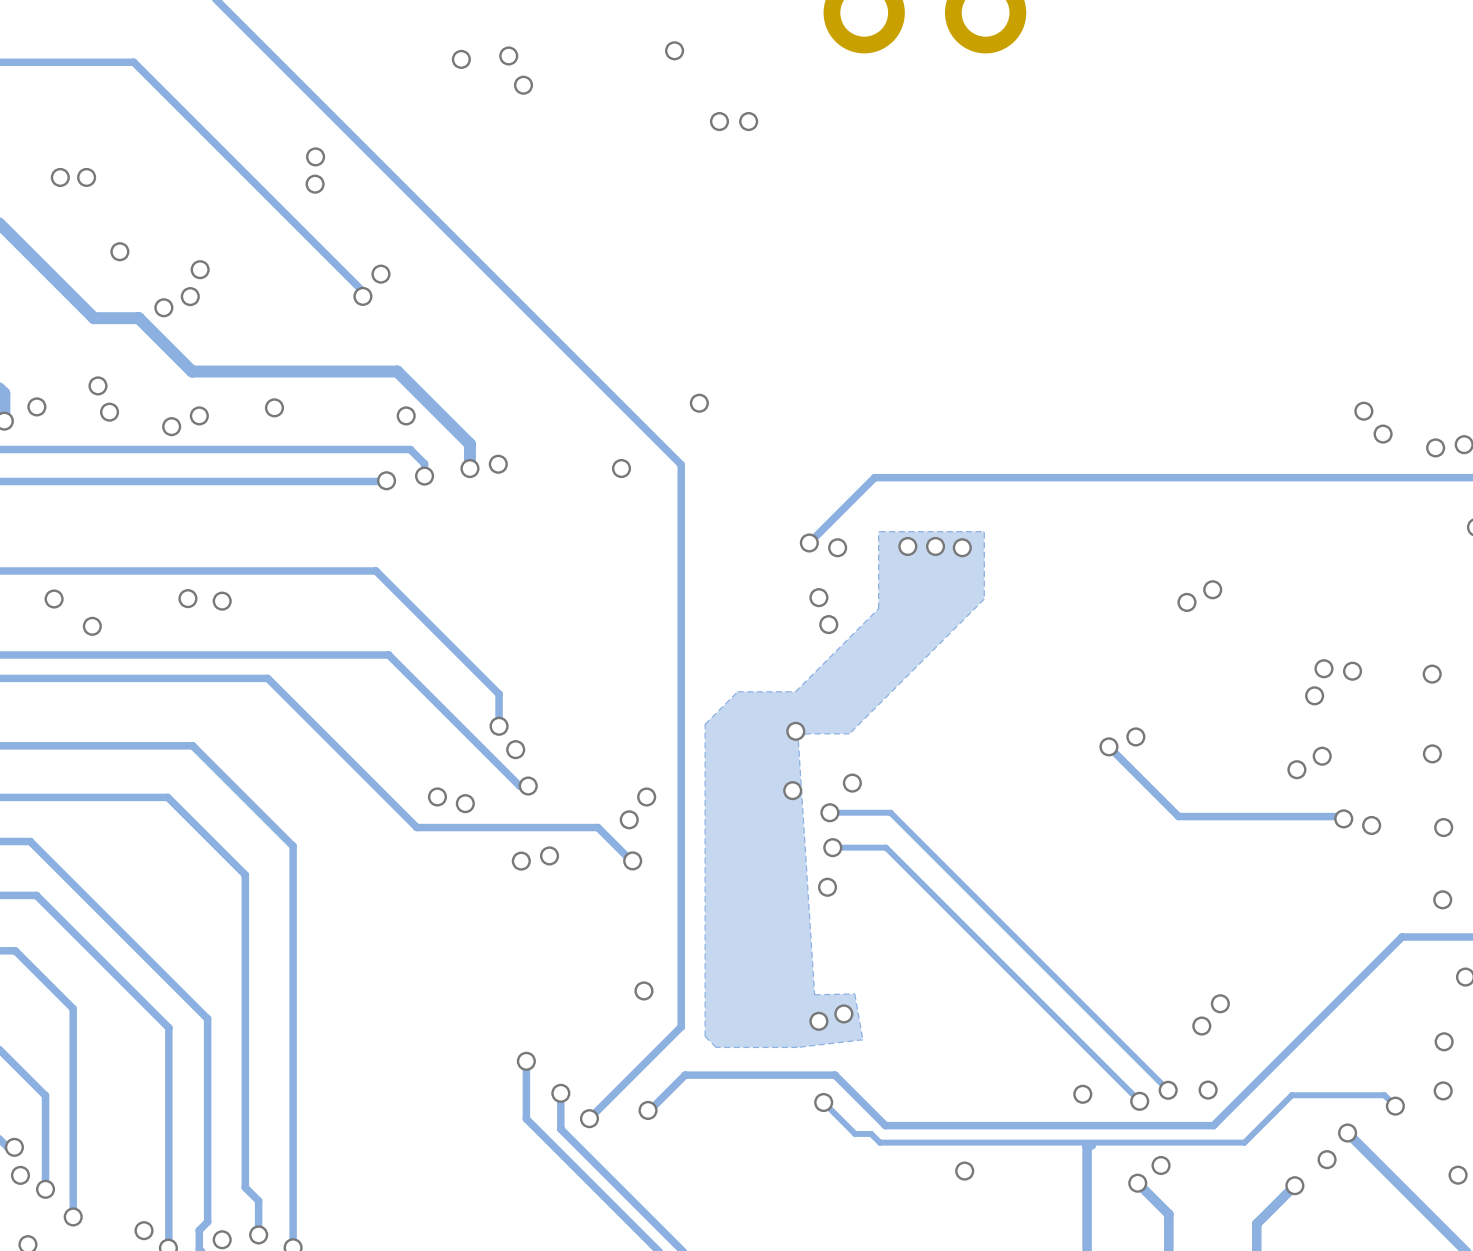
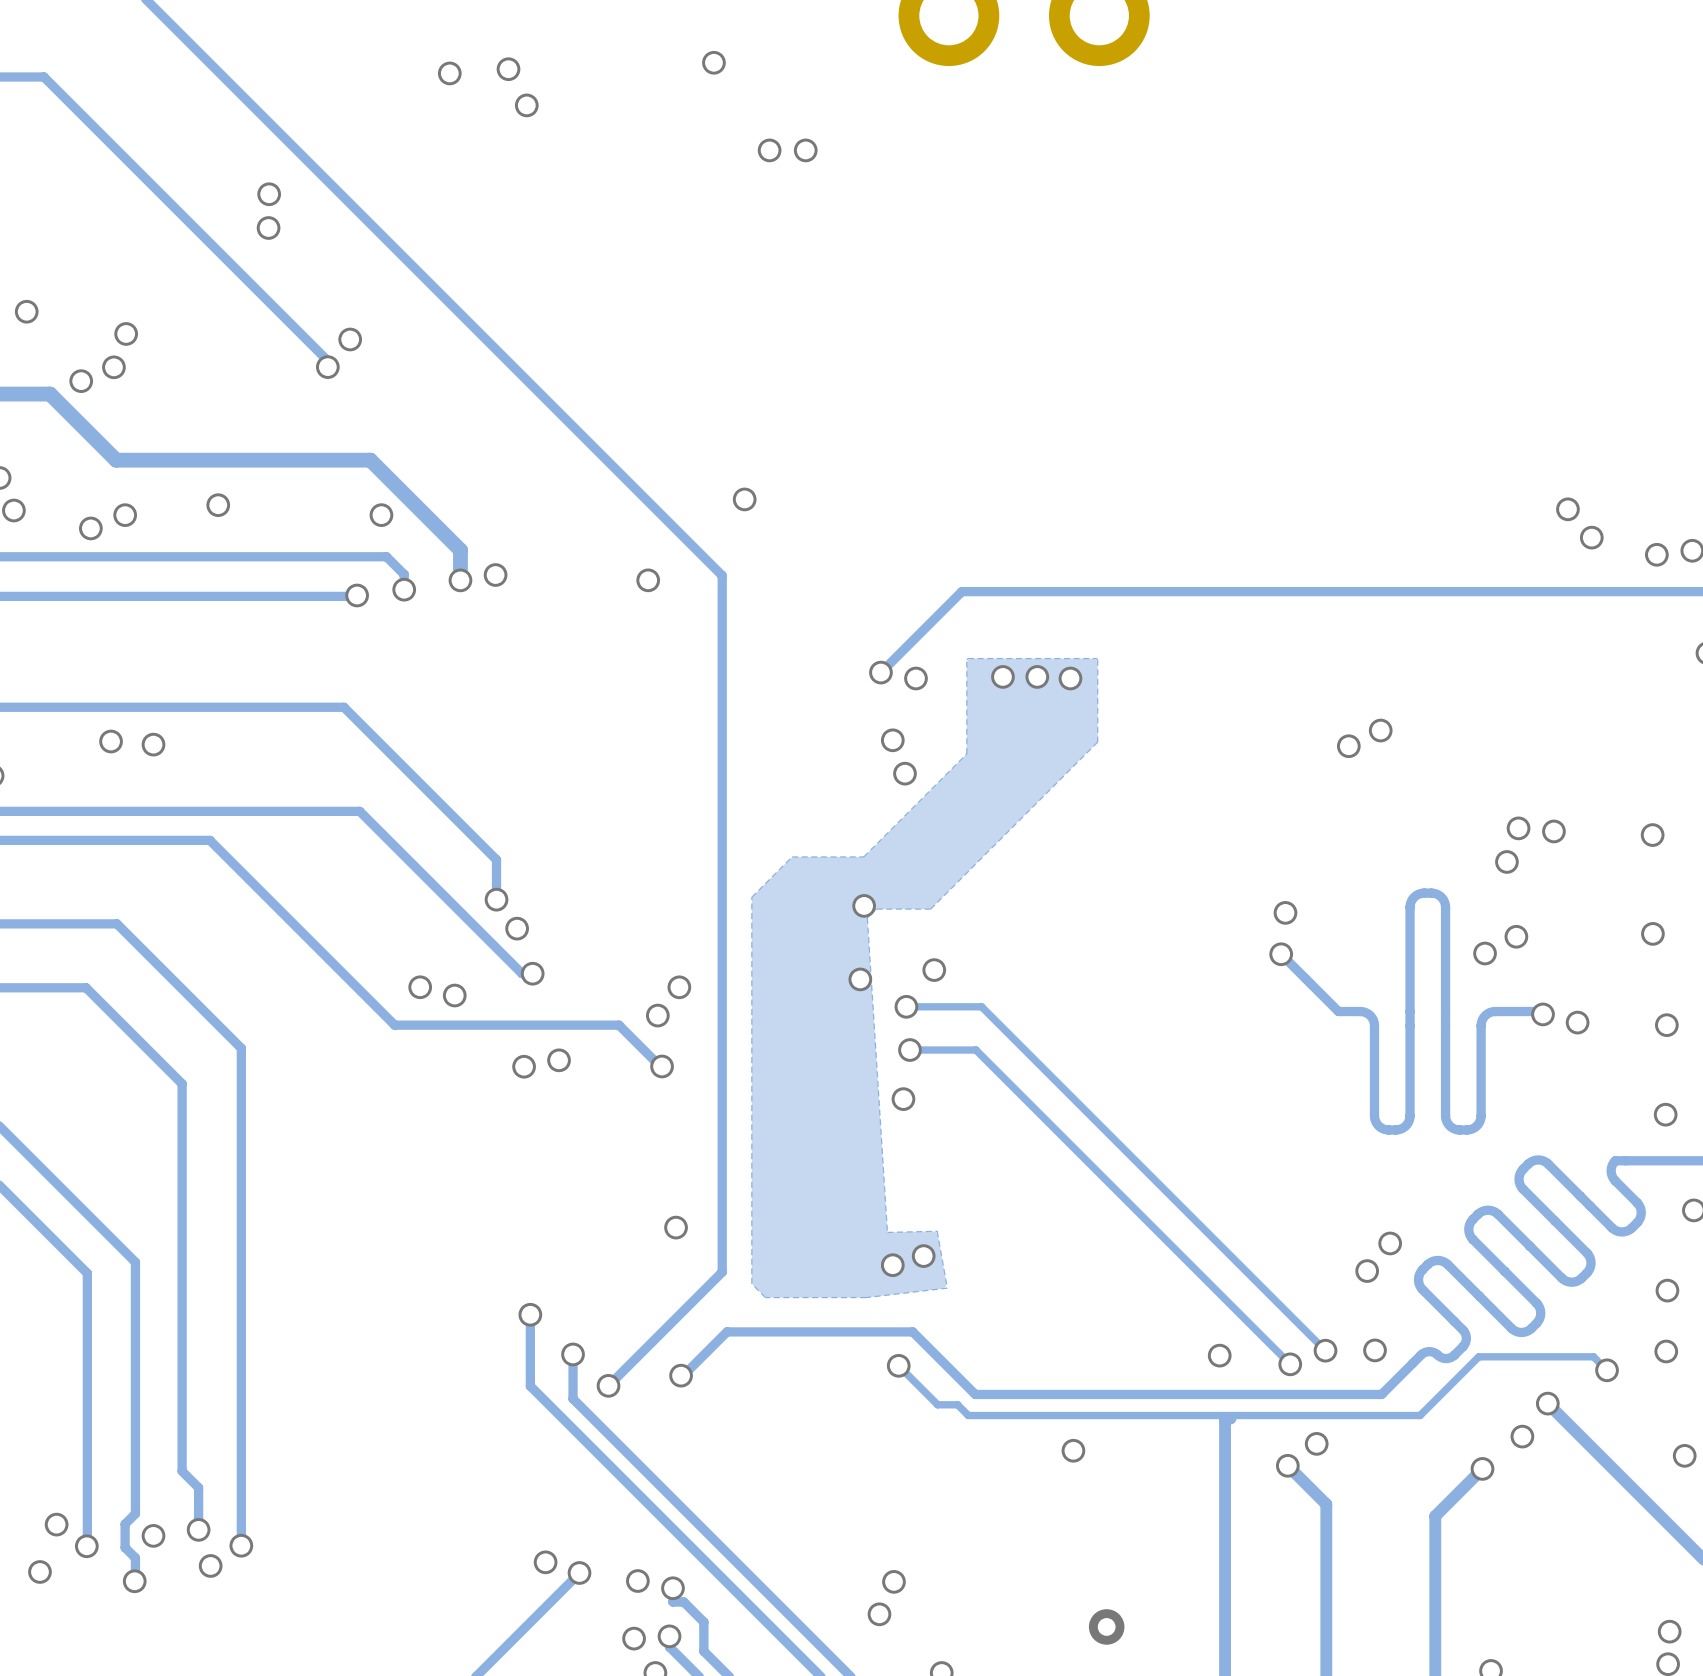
track: (1108, 746) (1132, 770) -> none
via position: (1108, 746) -> (1281, 954)
track: (1305, 816) (1196, 816) -> (1495, 1011) (1486, 1014) (1481, 1022) (1481, 1117) (1475, 1126) (1466, 1129) (1452, 1127) (1445, 1117) (1445, 907) (1443, 899) (1438, 895) (1432, 893) (1419, 893) (1413, 898) (1410, 905) (1410, 1115) (1406, 1124) (1400, 1129) (1384, 1129) (1375, 1120) (1374, 1024) (1369, 1014) (1360, 1011)
track: (1402, 937) (1245, 1093) -> (1615, 1160) (1611, 1168) (1613, 1177) (1638, 1204) (1641, 1210) (1638, 1221) (1630, 1228) (1623, 1231) (1611, 1227) (1545, 1161) (1538, 1159) (1531, 1161) (1519, 1174) (1519, 1182) (1522, 1188) (1589, 1255) (1589, 1268) (1577, 1280) (1570, 1282) (1562, 1279) (1495, 1212) (1482, 1211) (1470, 1223) (1468, 1231) (1471, 1238) (1538, 1306) (1539, 1318) (1529, 1330) (1519, 1332) (1512, 1329) (1444, 1262) (1434, 1260) (1422, 1269) (1418, 1278) (1420, 1287) (1462, 1329) (1466, 1338) (1463, 1345) (1450, 1357) (1443, 1358) (1430, 1351) (1421, 1355)

